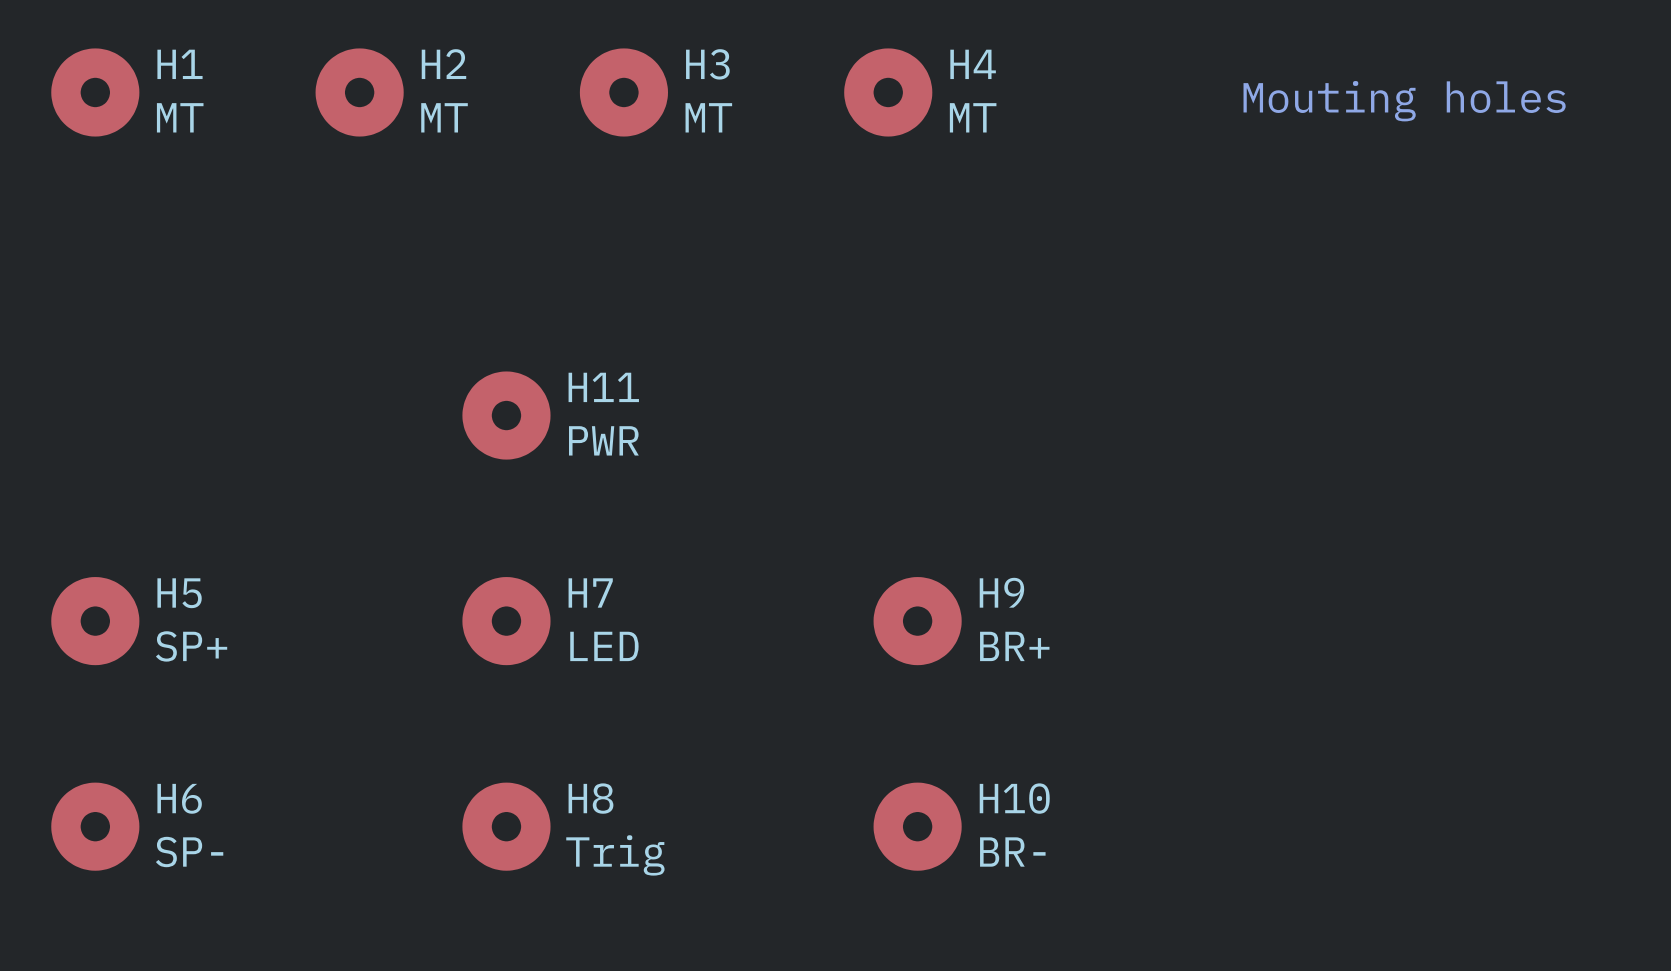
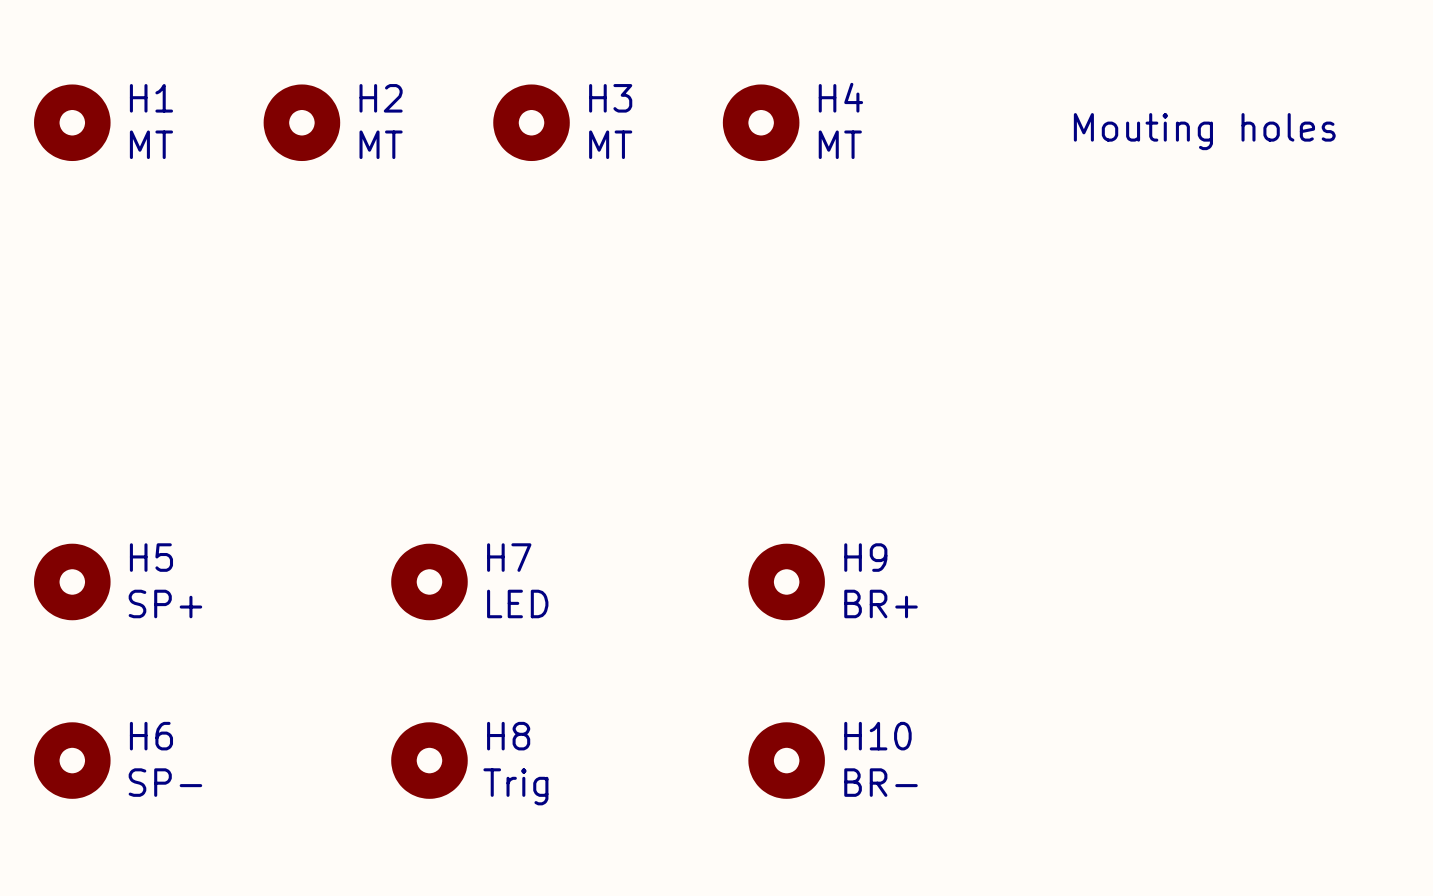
H11: PWR (506, 415) -> none

